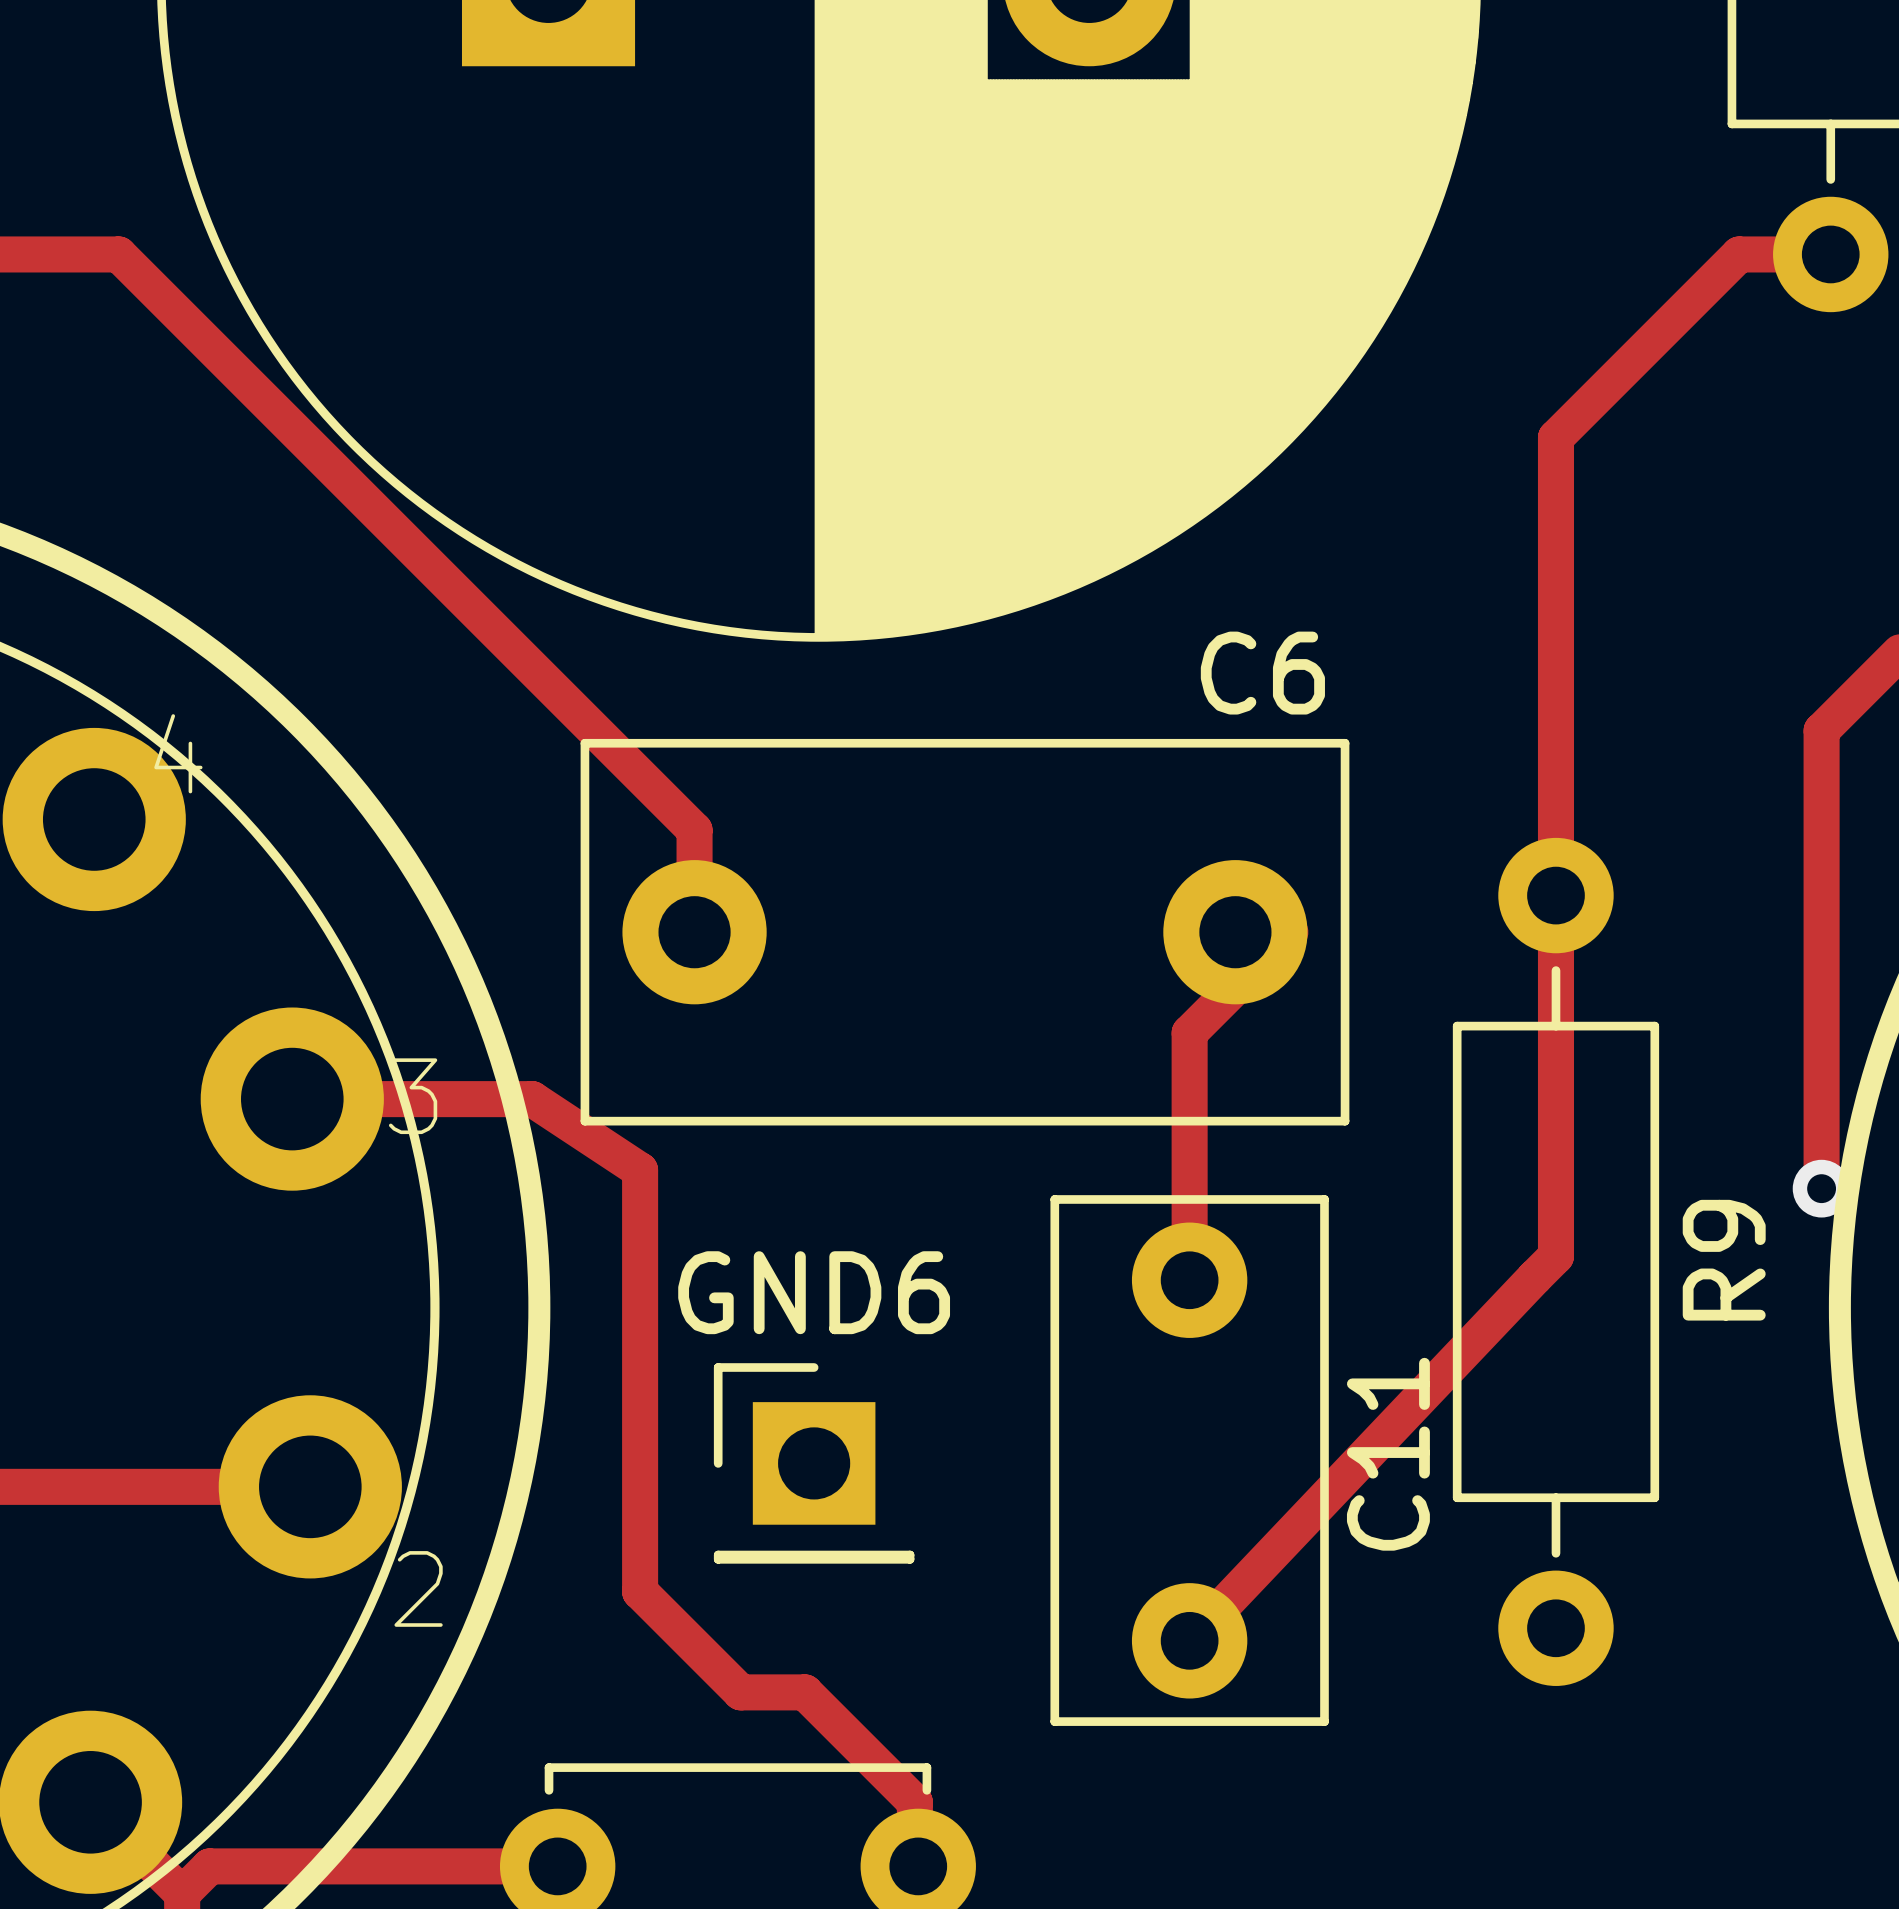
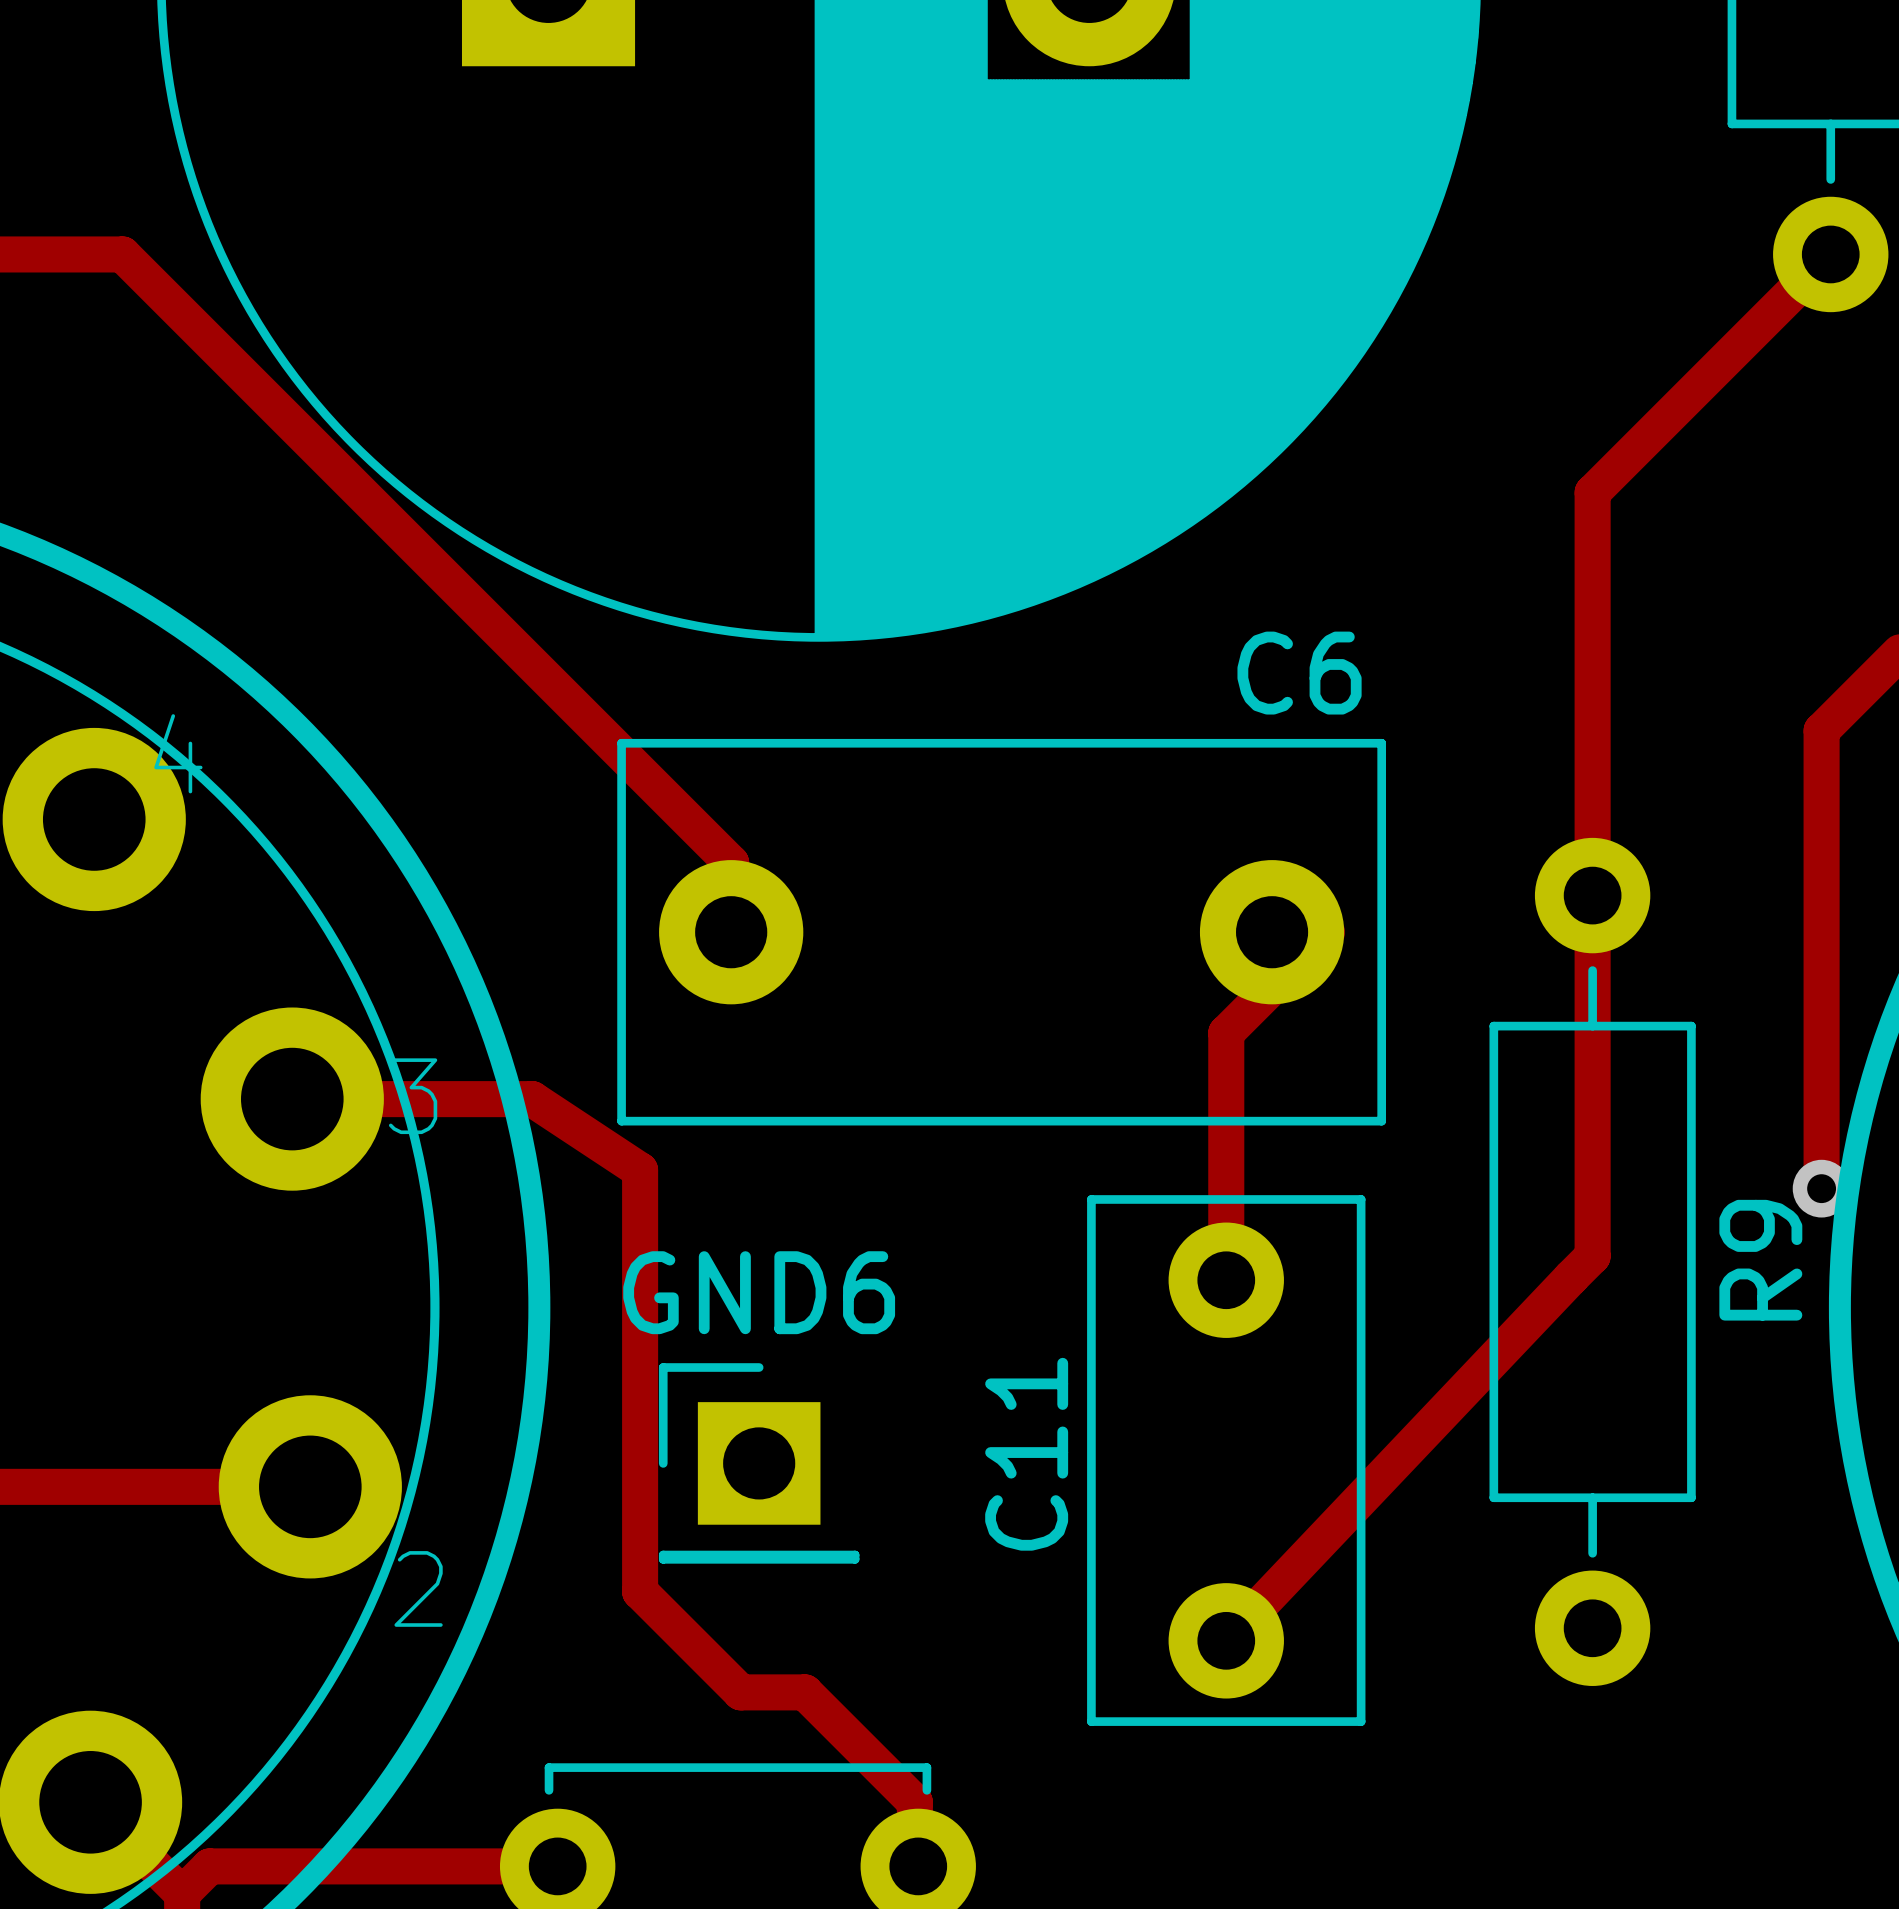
track: (118, 254) (694, 830) (694, 932) -> (118, 254) (122, 254) (731, 863) (731, 932)
track: (1830, 254) (1739, 254) (1555, 437) (1555, 1256) (1189, 1640) -> (1830, 254) (1592, 492) (1592, 1256) (1226, 1640)
C6 position: (964, 932) -> (1001, 932)
track: (1290, 932) (1189, 1032) (1189, 1261) -> (1327, 932) (1226, 1032) (1226, 1261)
R9 position: (1555, 1261) -> (1592, 1261)
C11 name position: C11 (1388, 1454) -> C11 (1026, 1454)
C11 position: (1189, 1460) -> (1226, 1460)
GND6 position: (814, 1463) -> (759, 1463)

